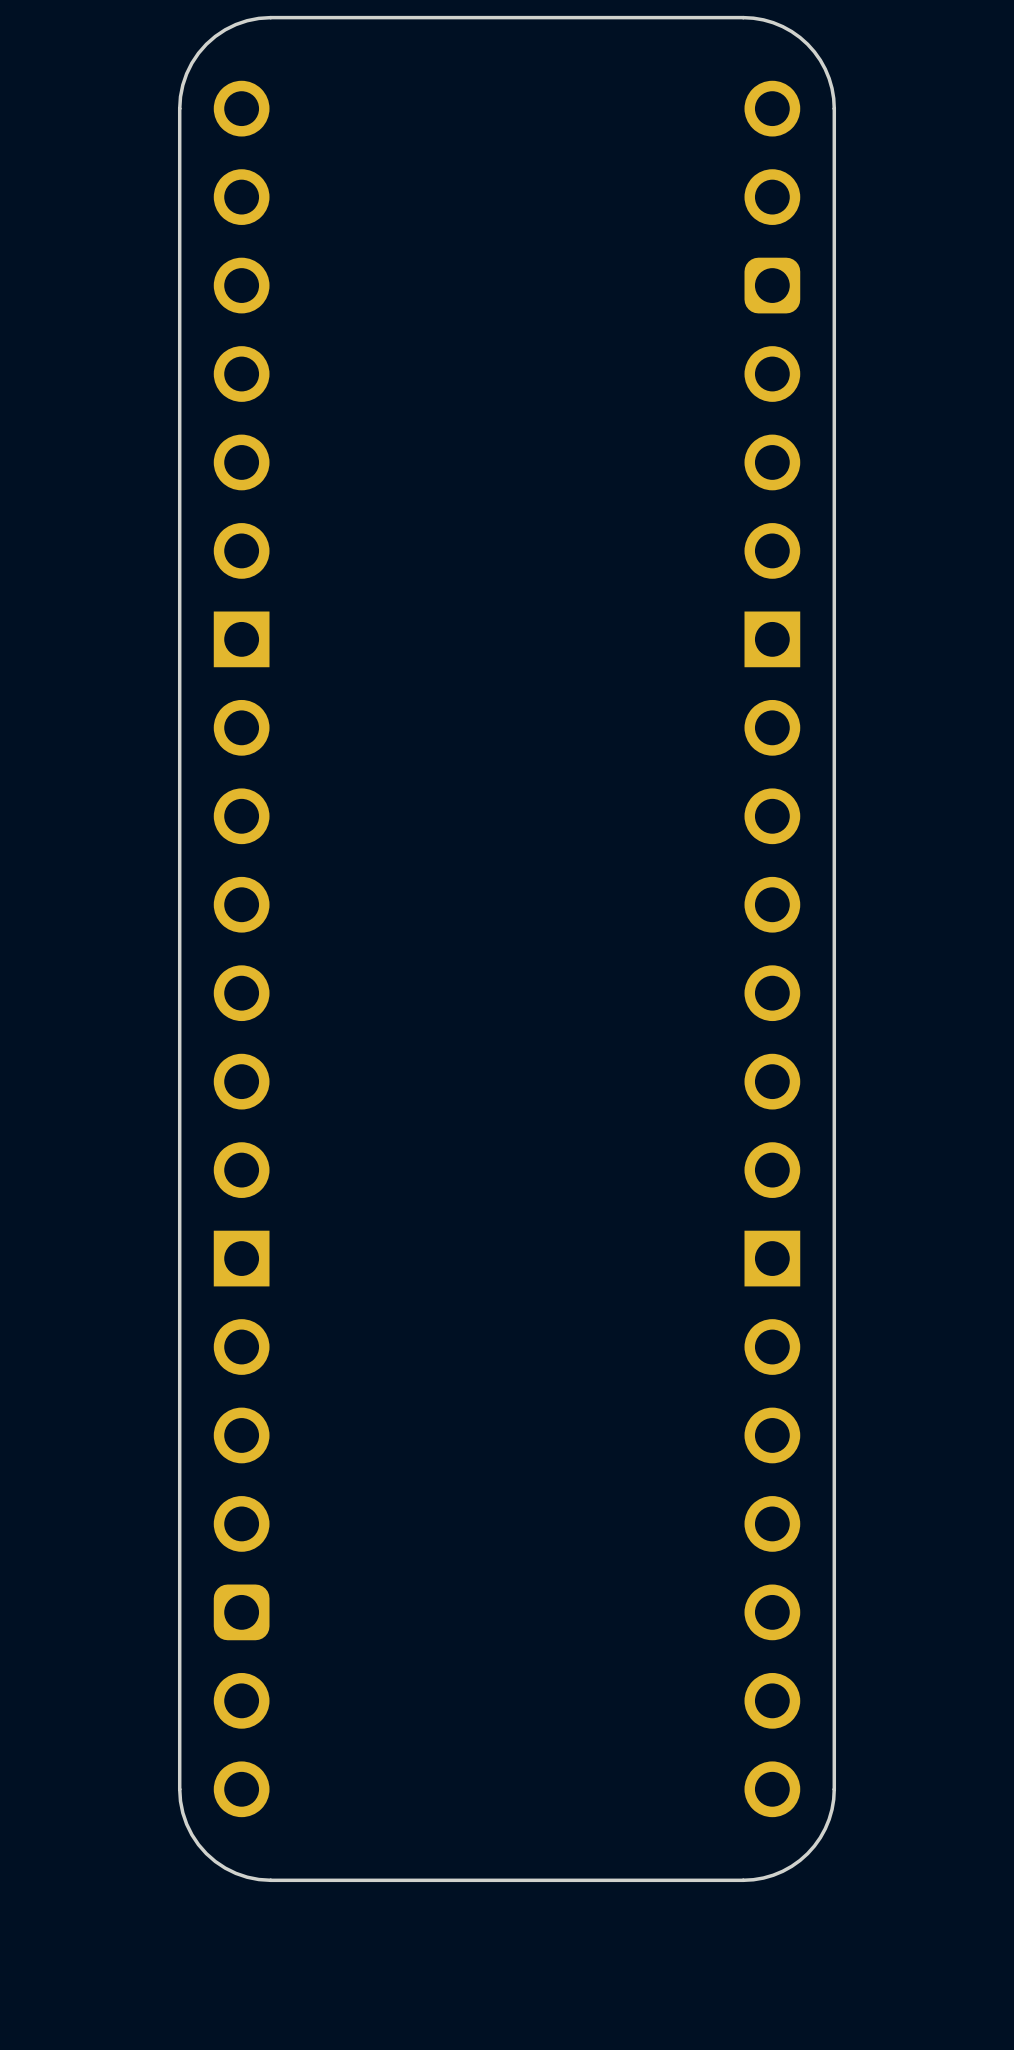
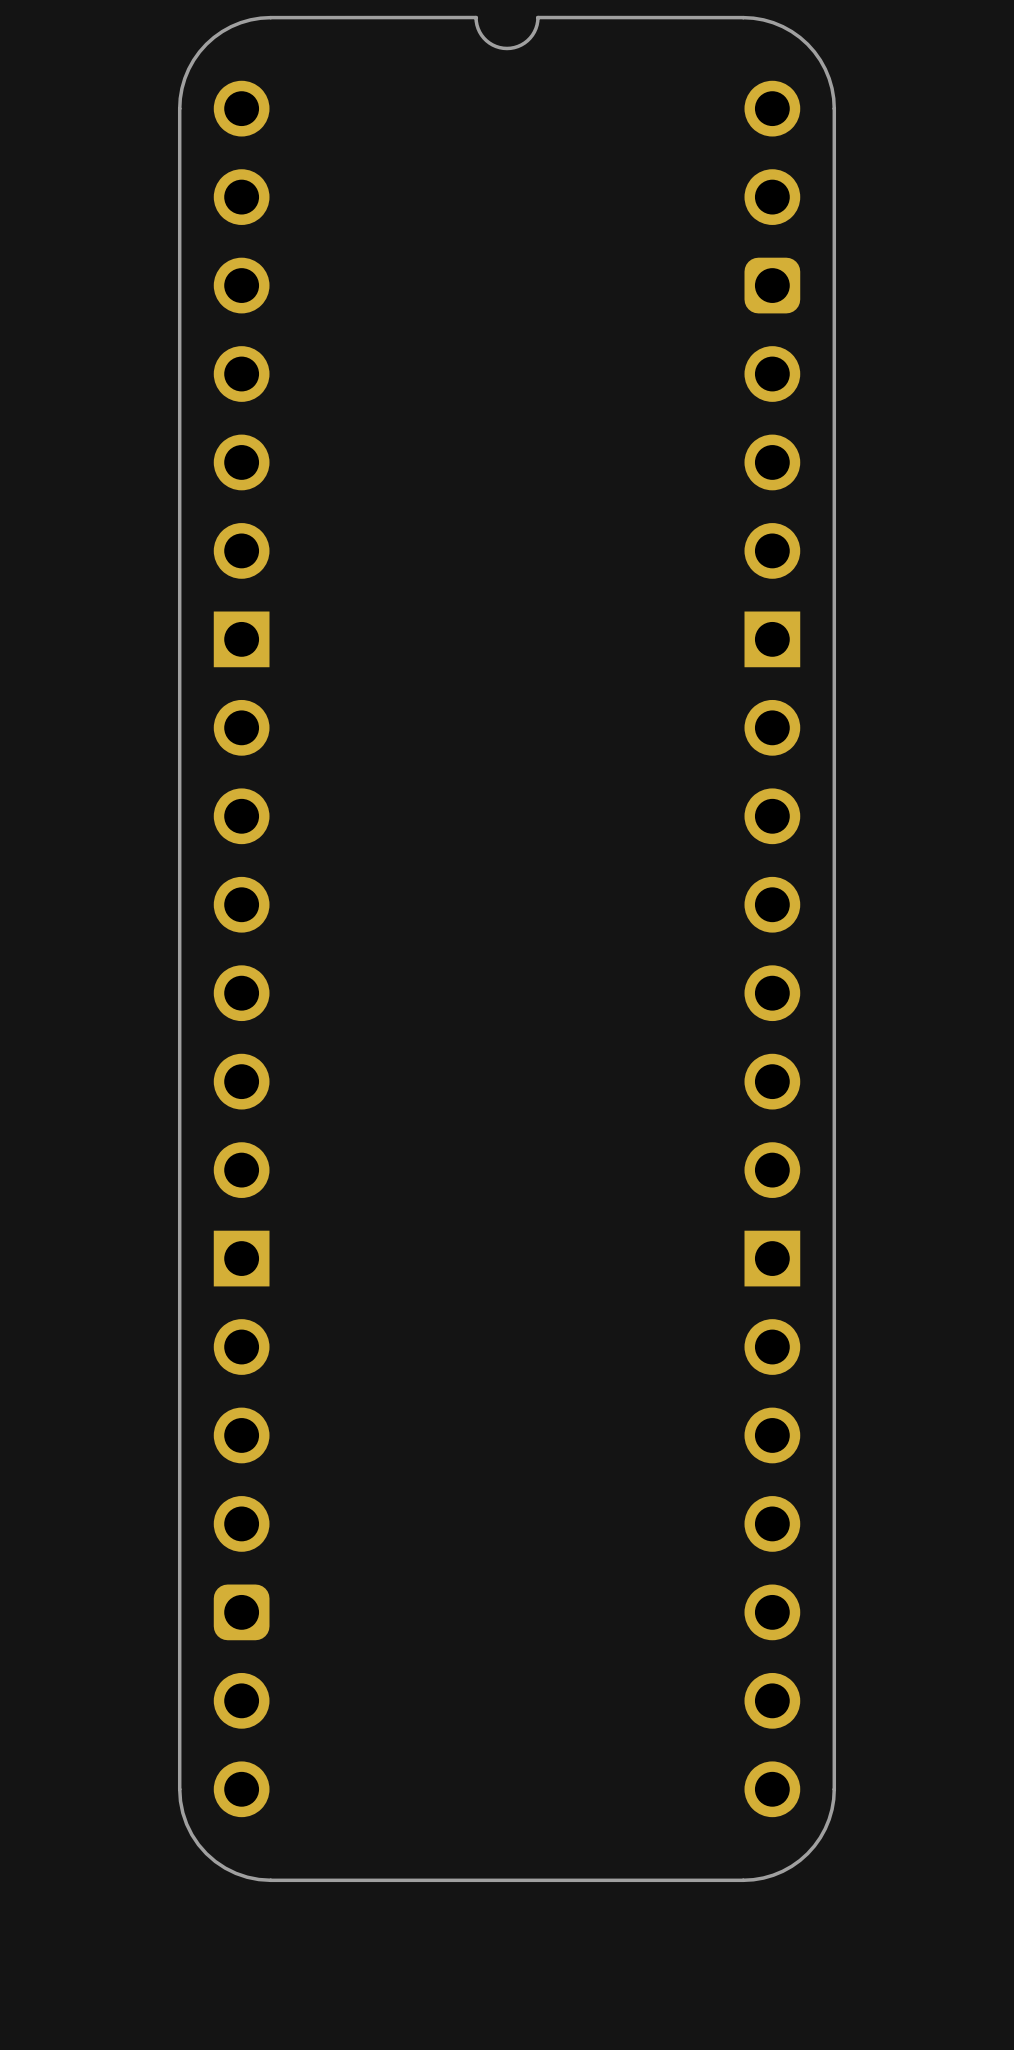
part footprint: [177, 15, 837, 1883] -> [177, 15, 837, 1883]

